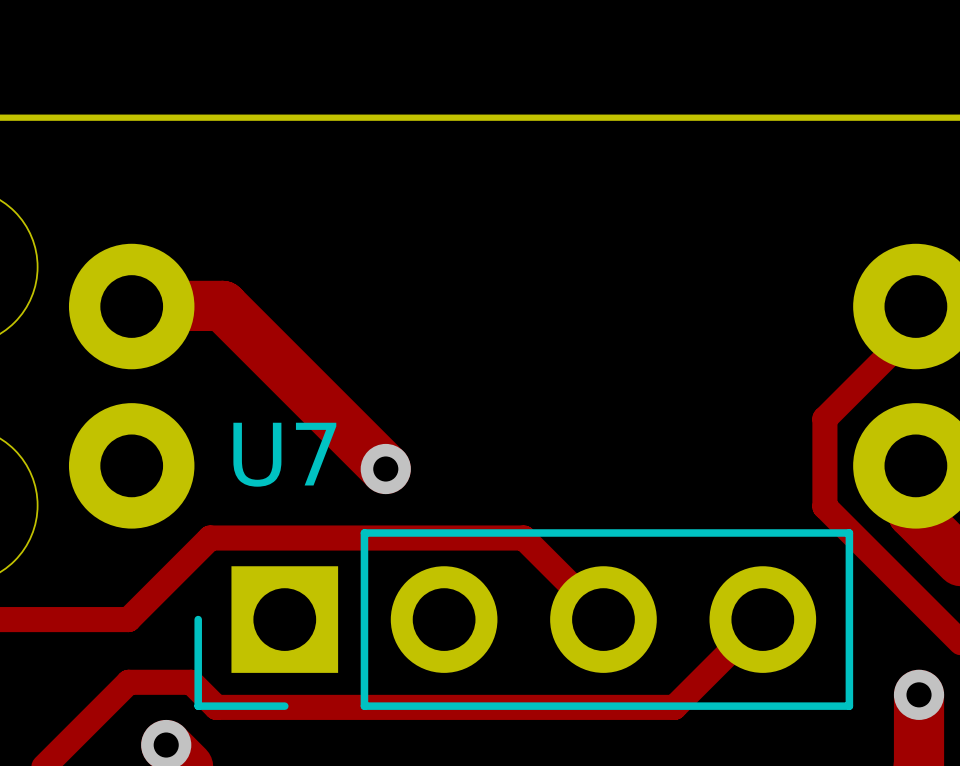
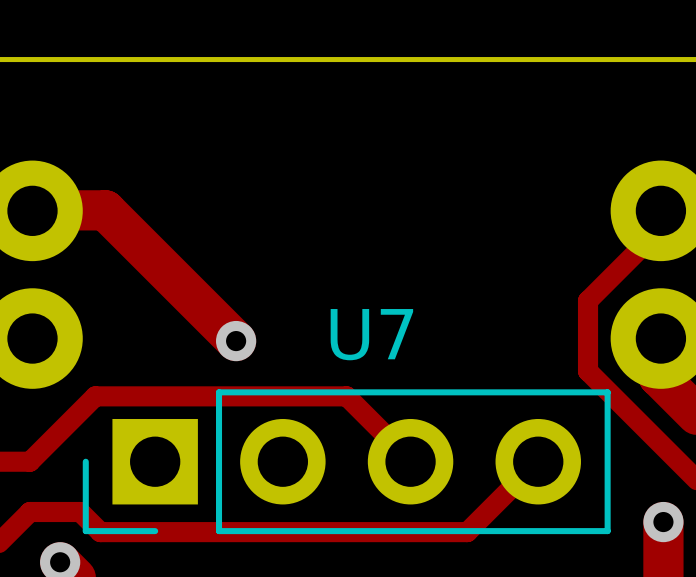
U7 name position: U7 (284, 454) -> U7 (371, 334)

